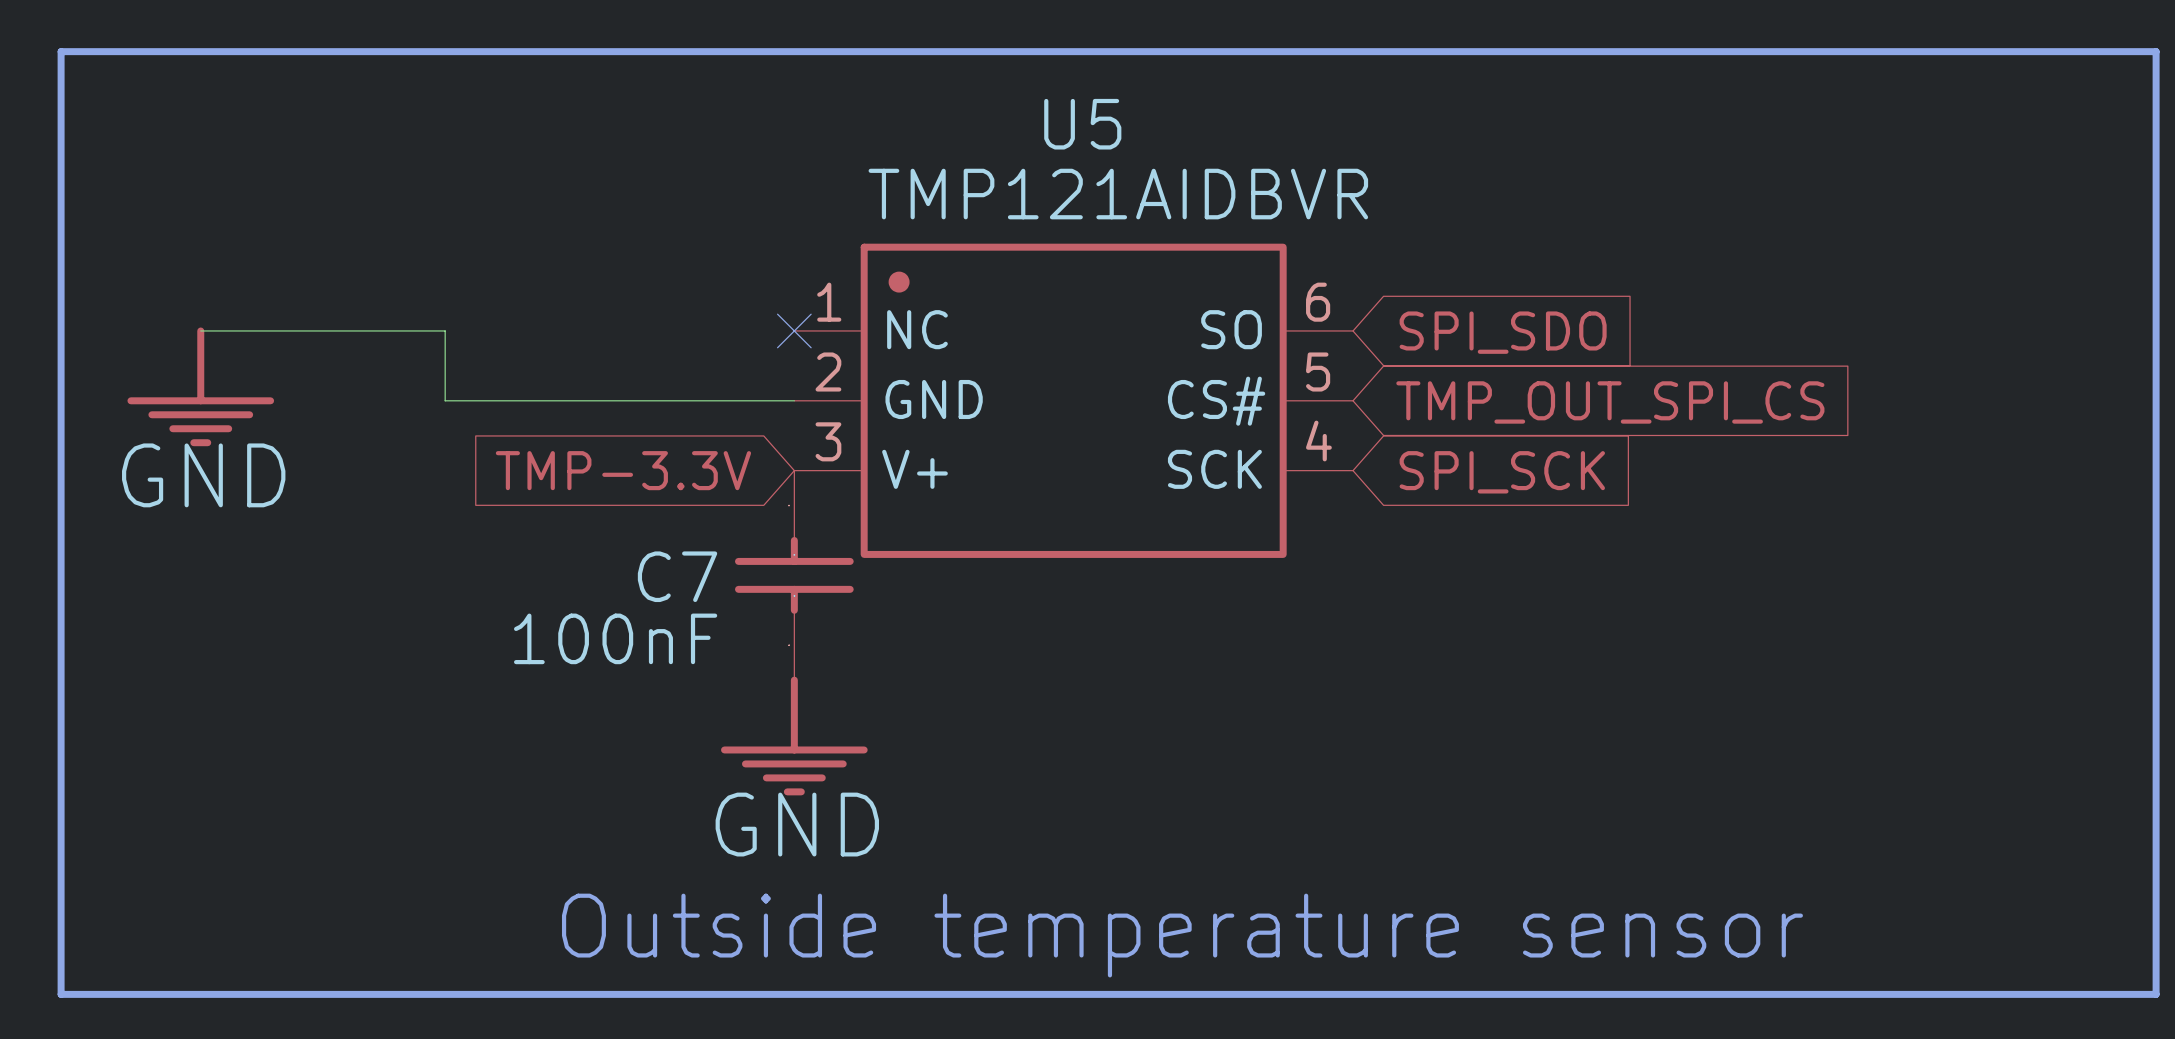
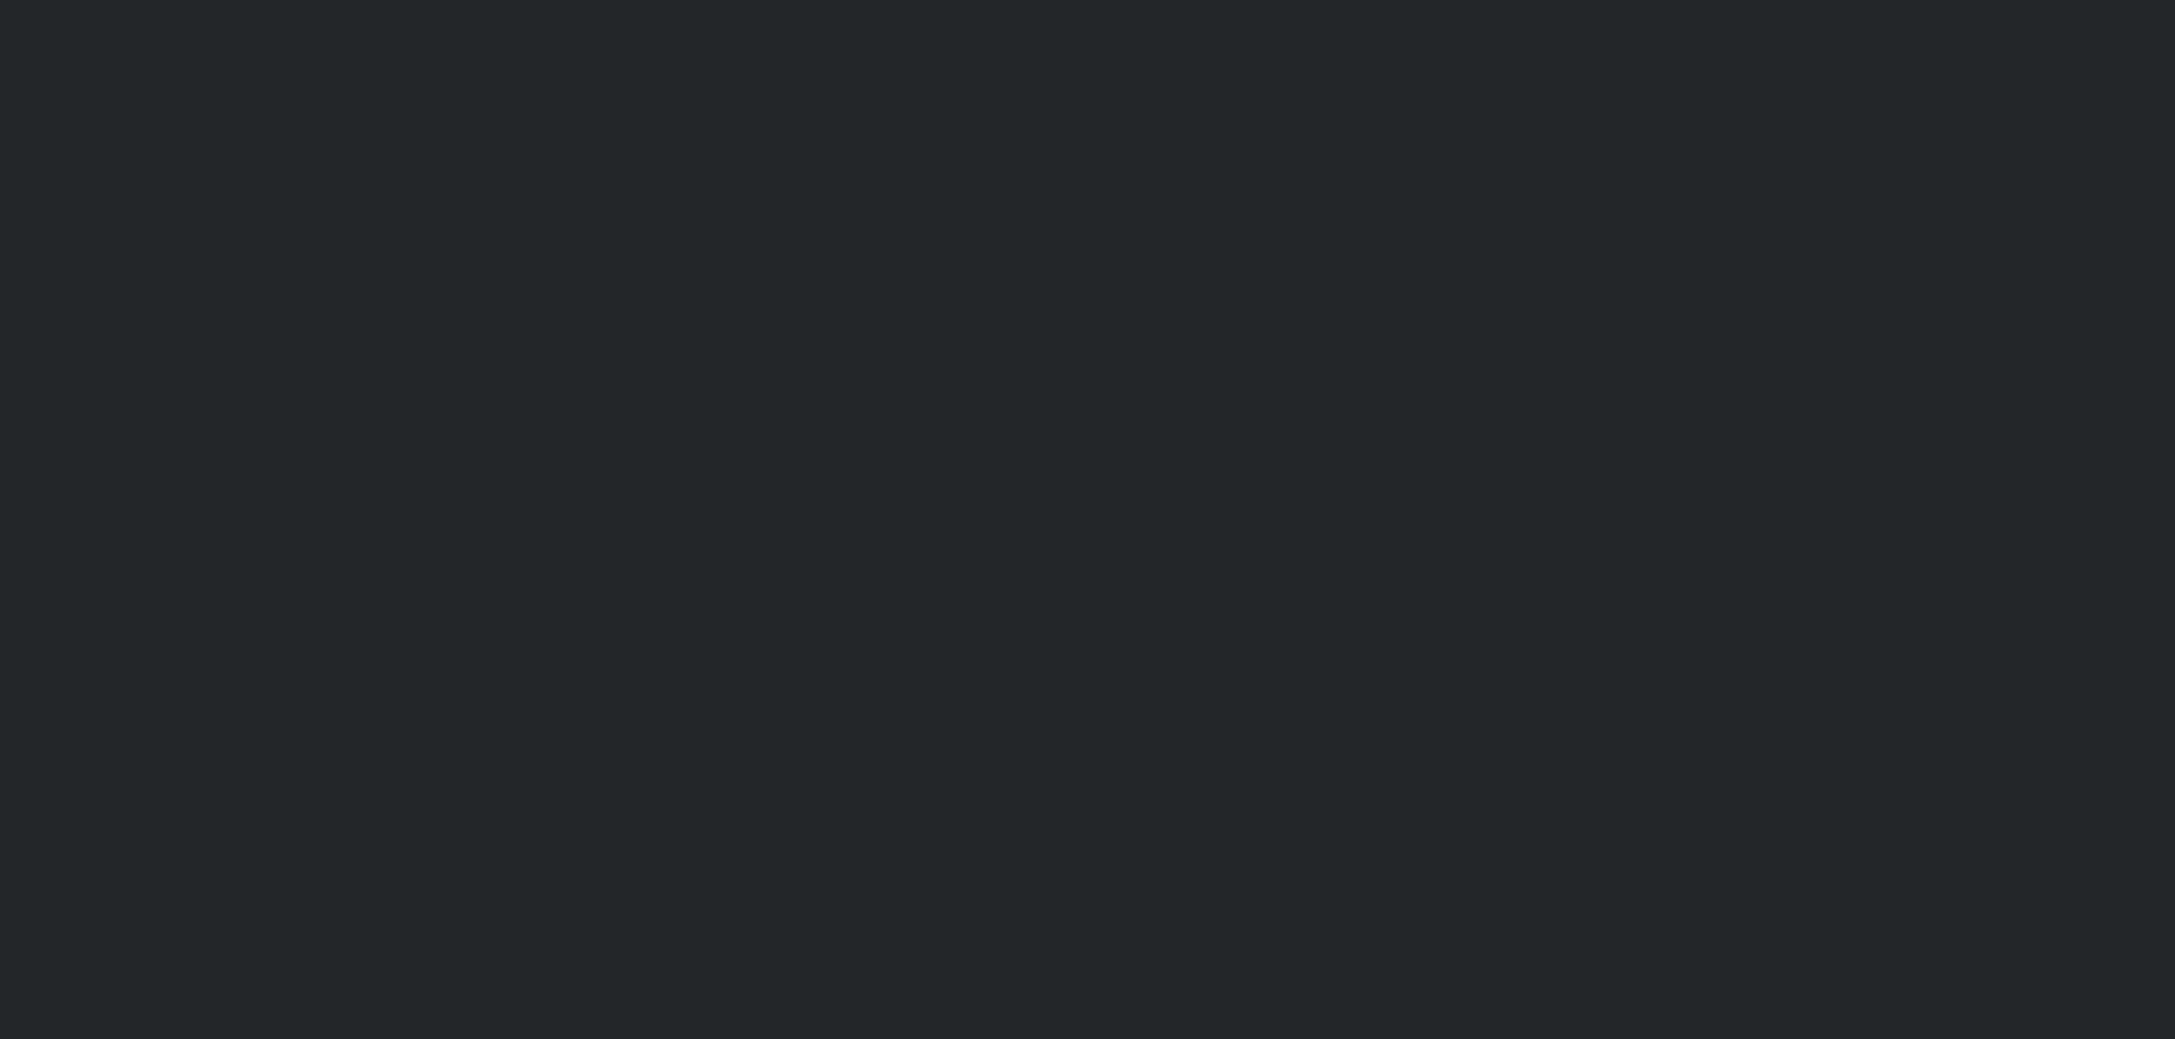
line: (61, 51) (2156, 51) (2156, 994) (61, 994) (61, 51) -> none
wire: (200, 330) (445, 330) (445, 400) (794, 400) -> none
no-connect mark: (794, 330) -> none
global label: SPI_SDO (1503, 332) -> none
power symbol: GND (200, 386) -> none
U5: TMP121AIDBVR (1073, 400) -> none
global label: TMP_OUT_SPI_CS (1610, 402) -> none
global label: TMP-3.3V (623, 470) -> none
global label: SPI_SCK (1502, 472) -> none
C7: 100nF (794, 575) -> none
power symbol: GND (794, 736) -> none
text: Outside temperature sensor (1182, 935) -> none

